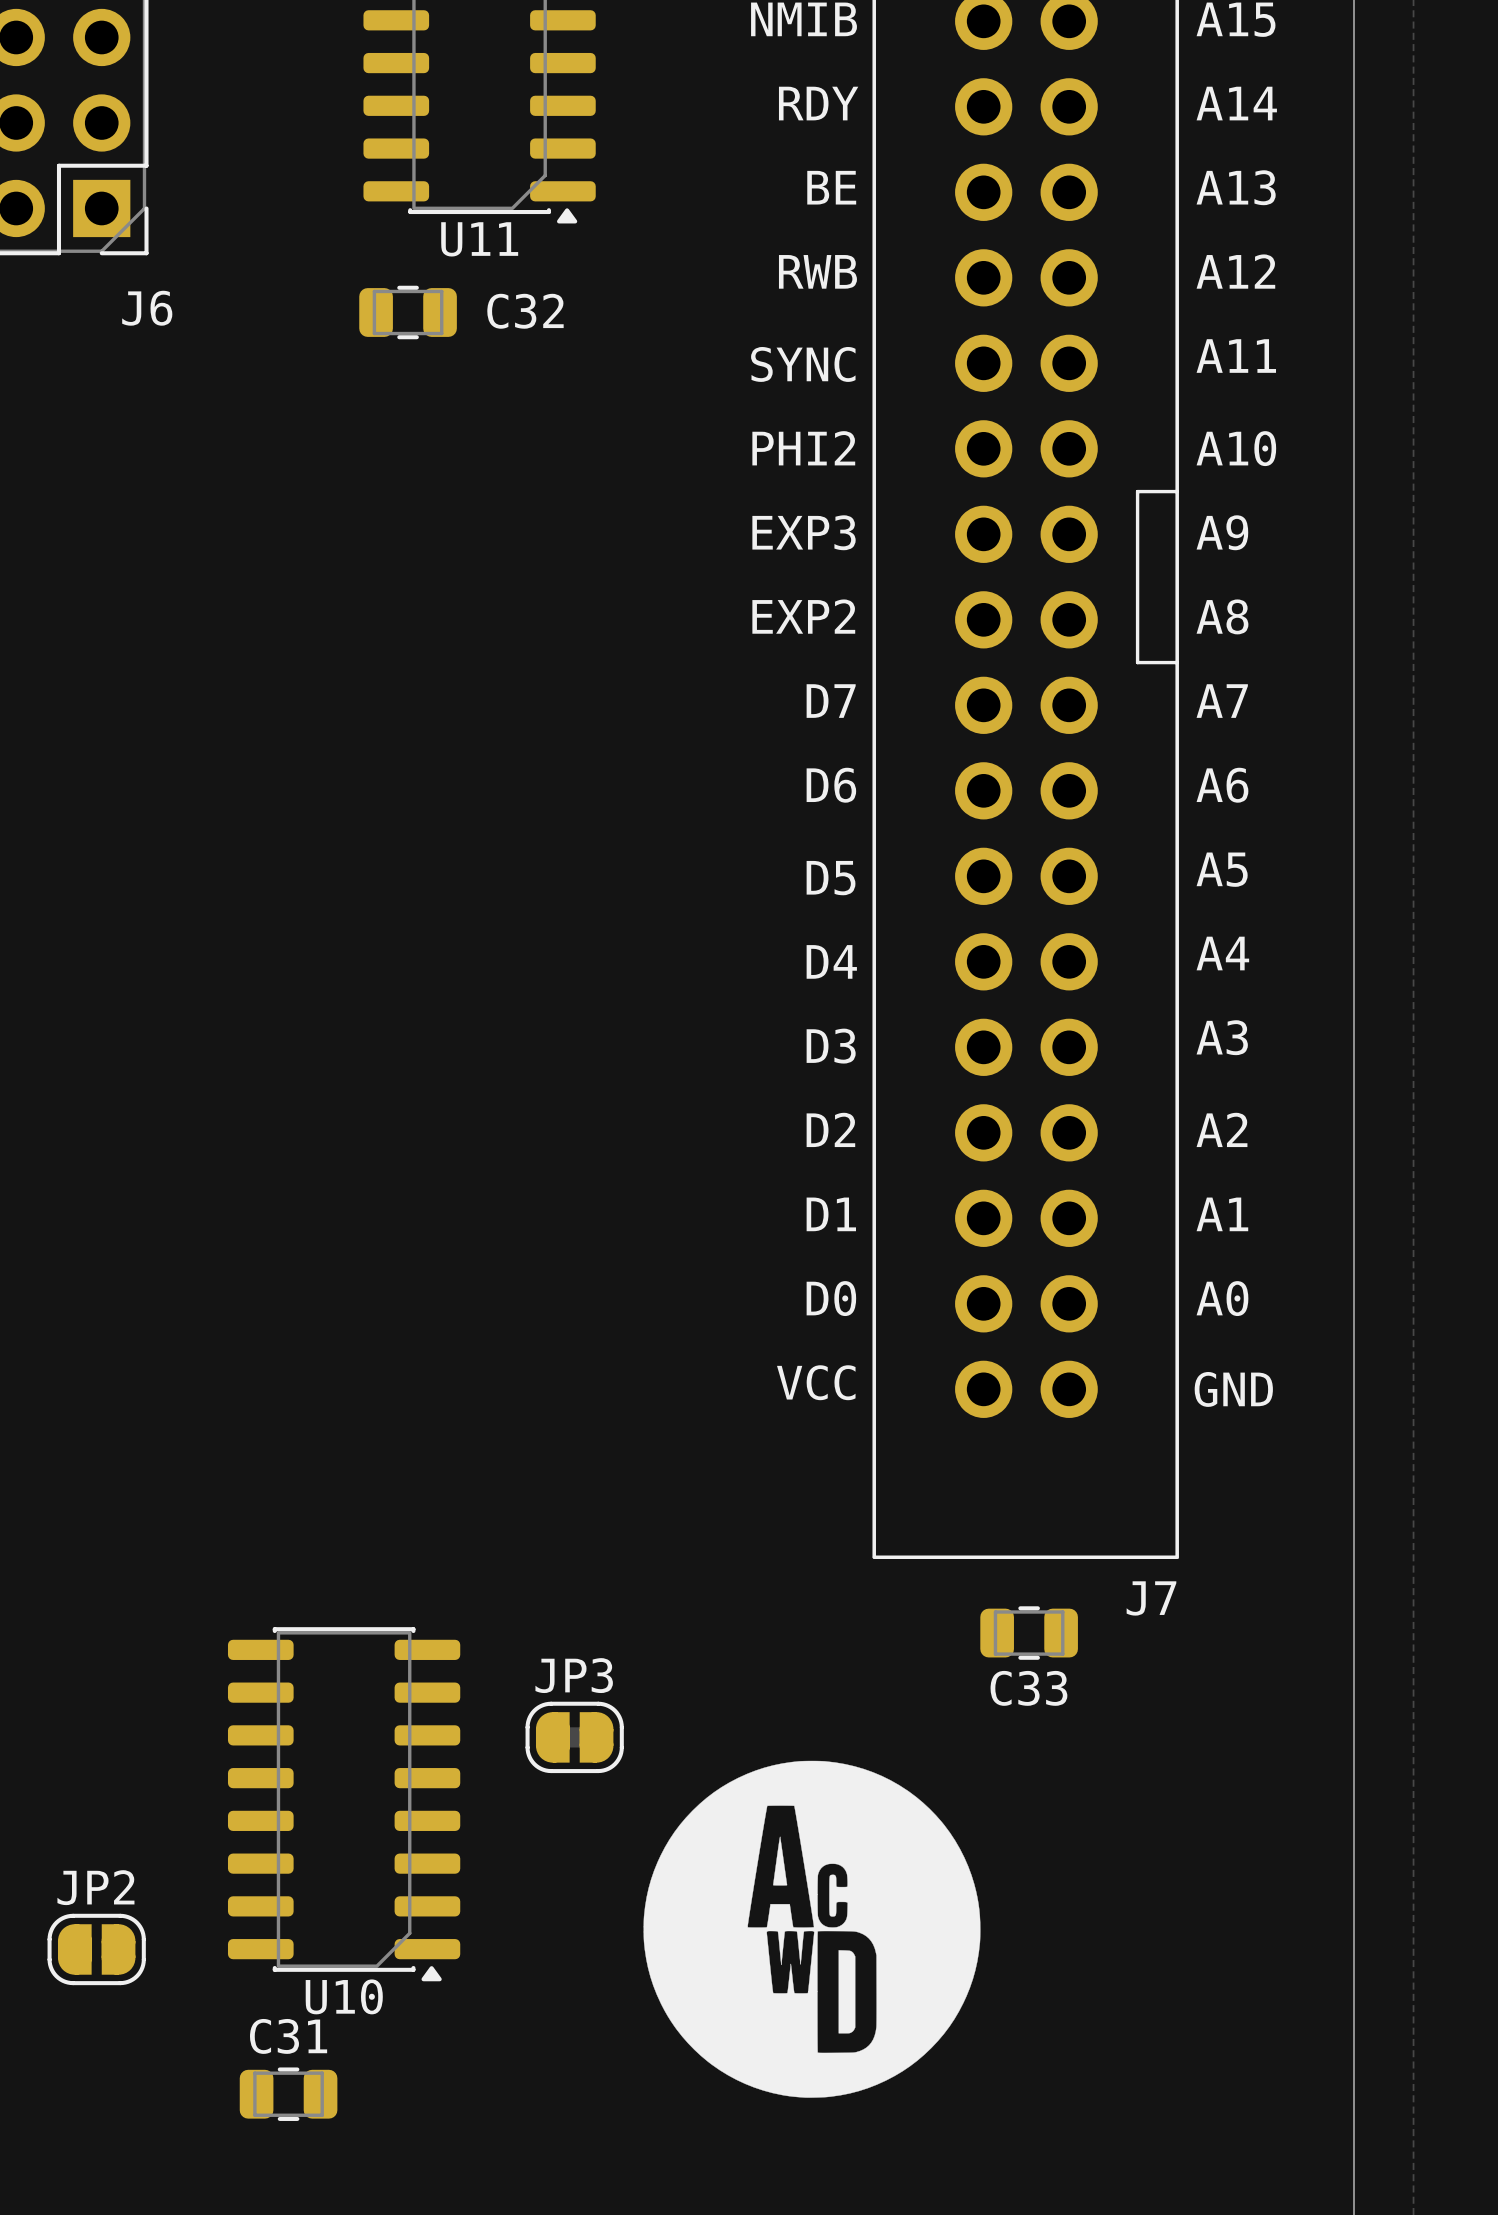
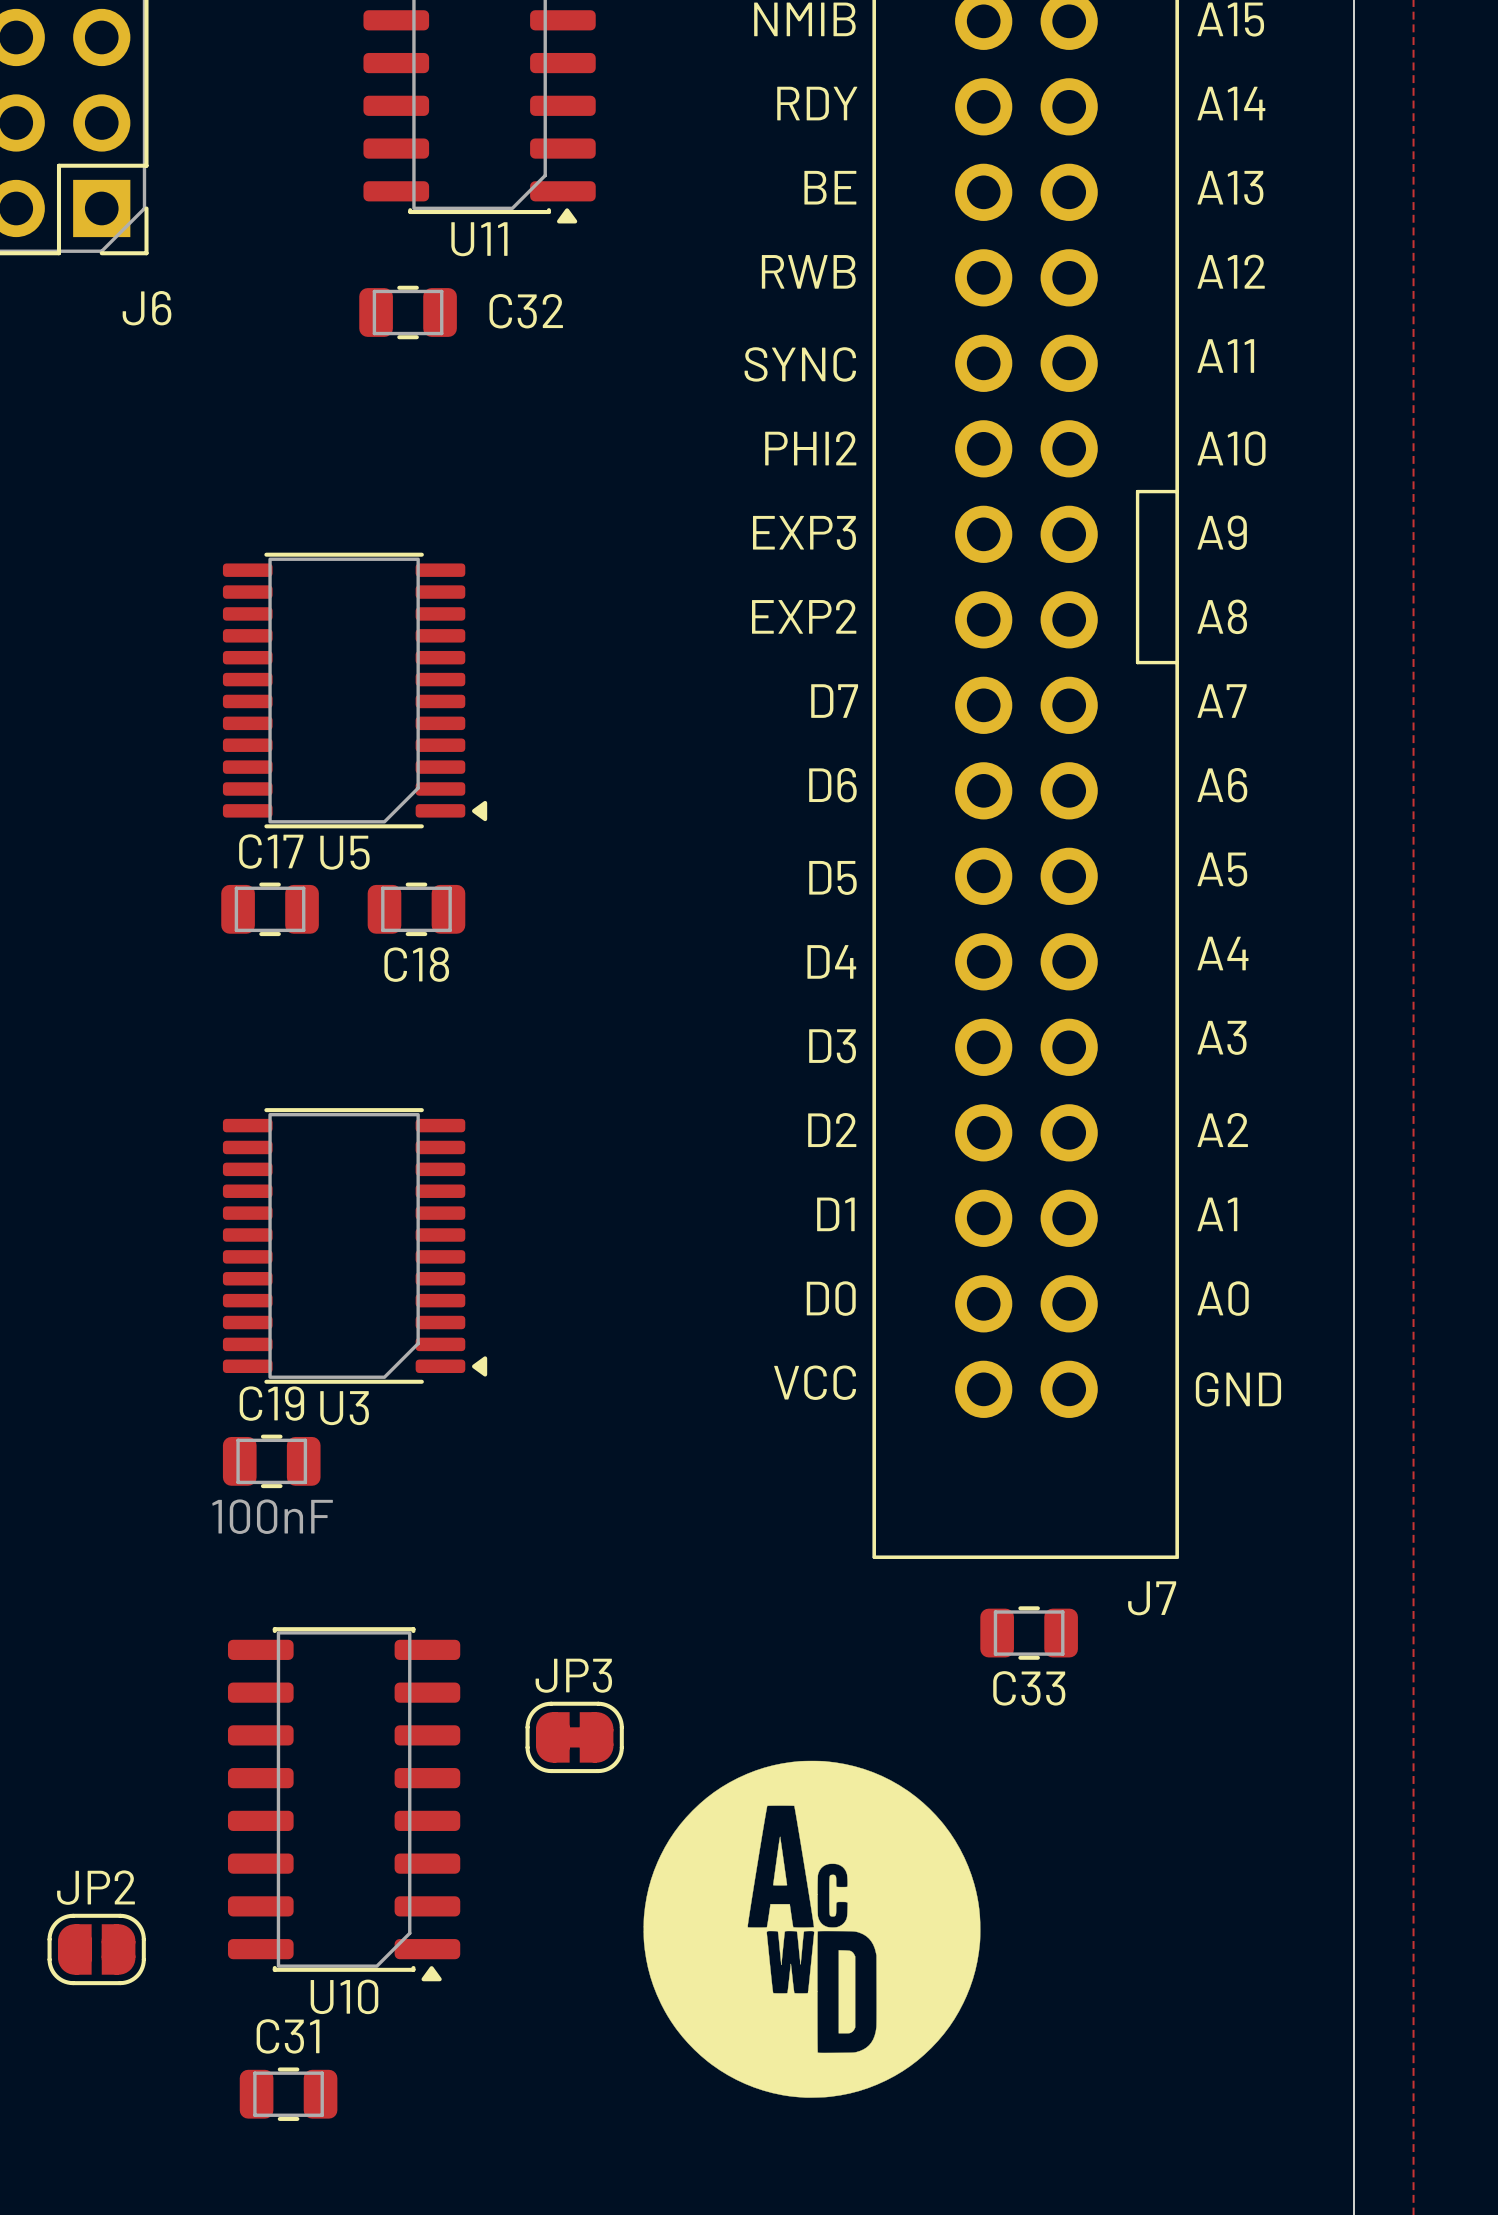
U5: none -> (355, 690)
C17: none -> (270, 909)
C18: none -> (416, 909)
U3: none -> (355, 1245)
C19: none -> 100nF (271, 1461)

